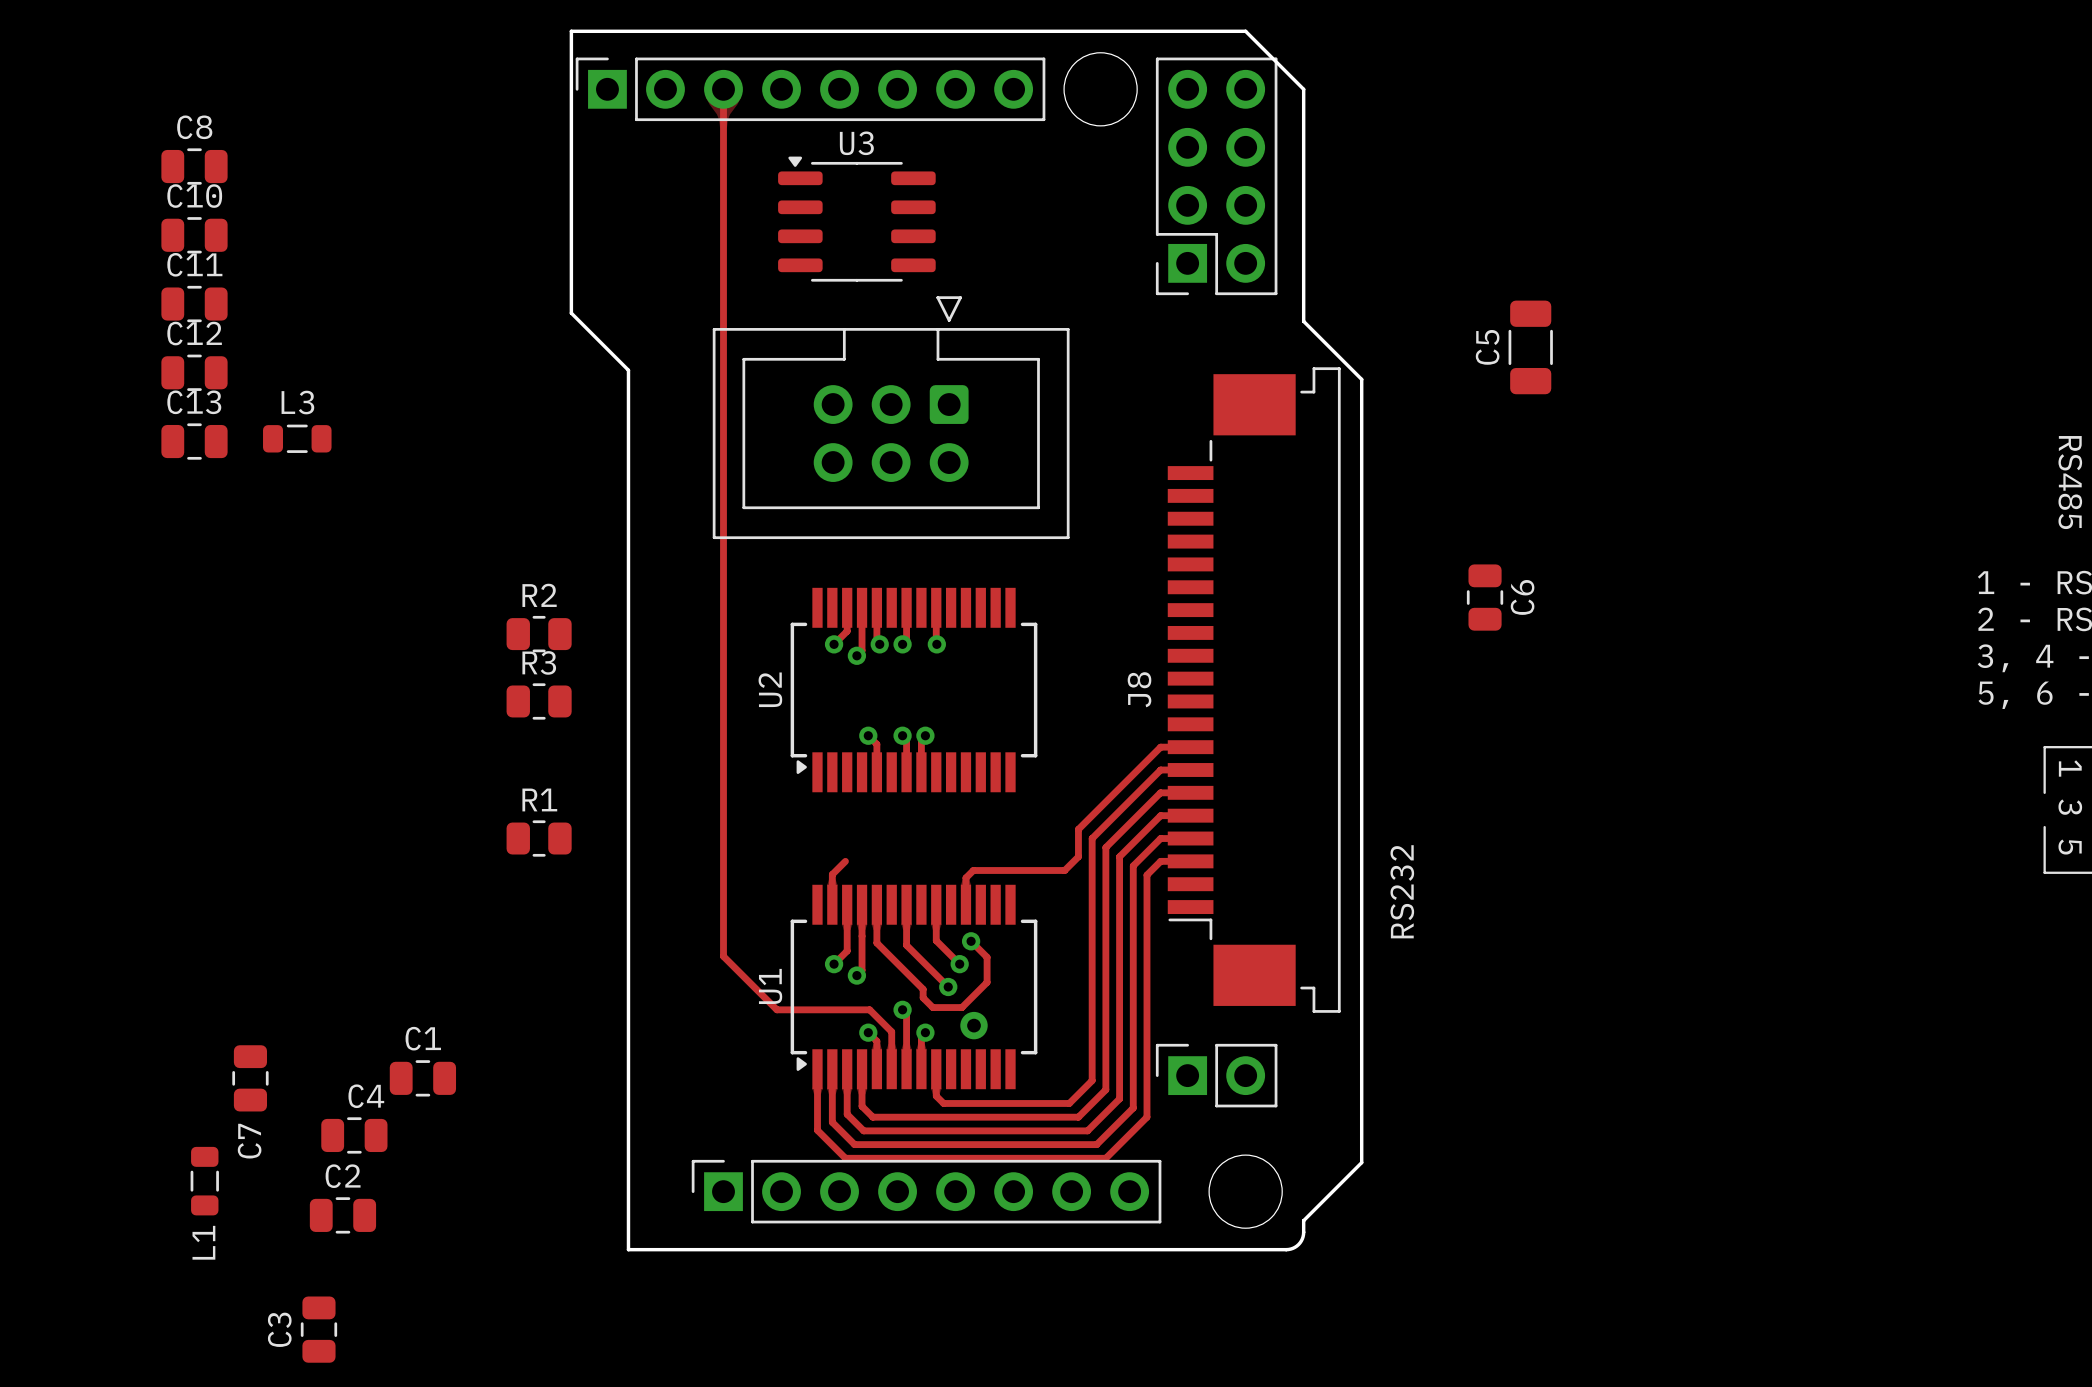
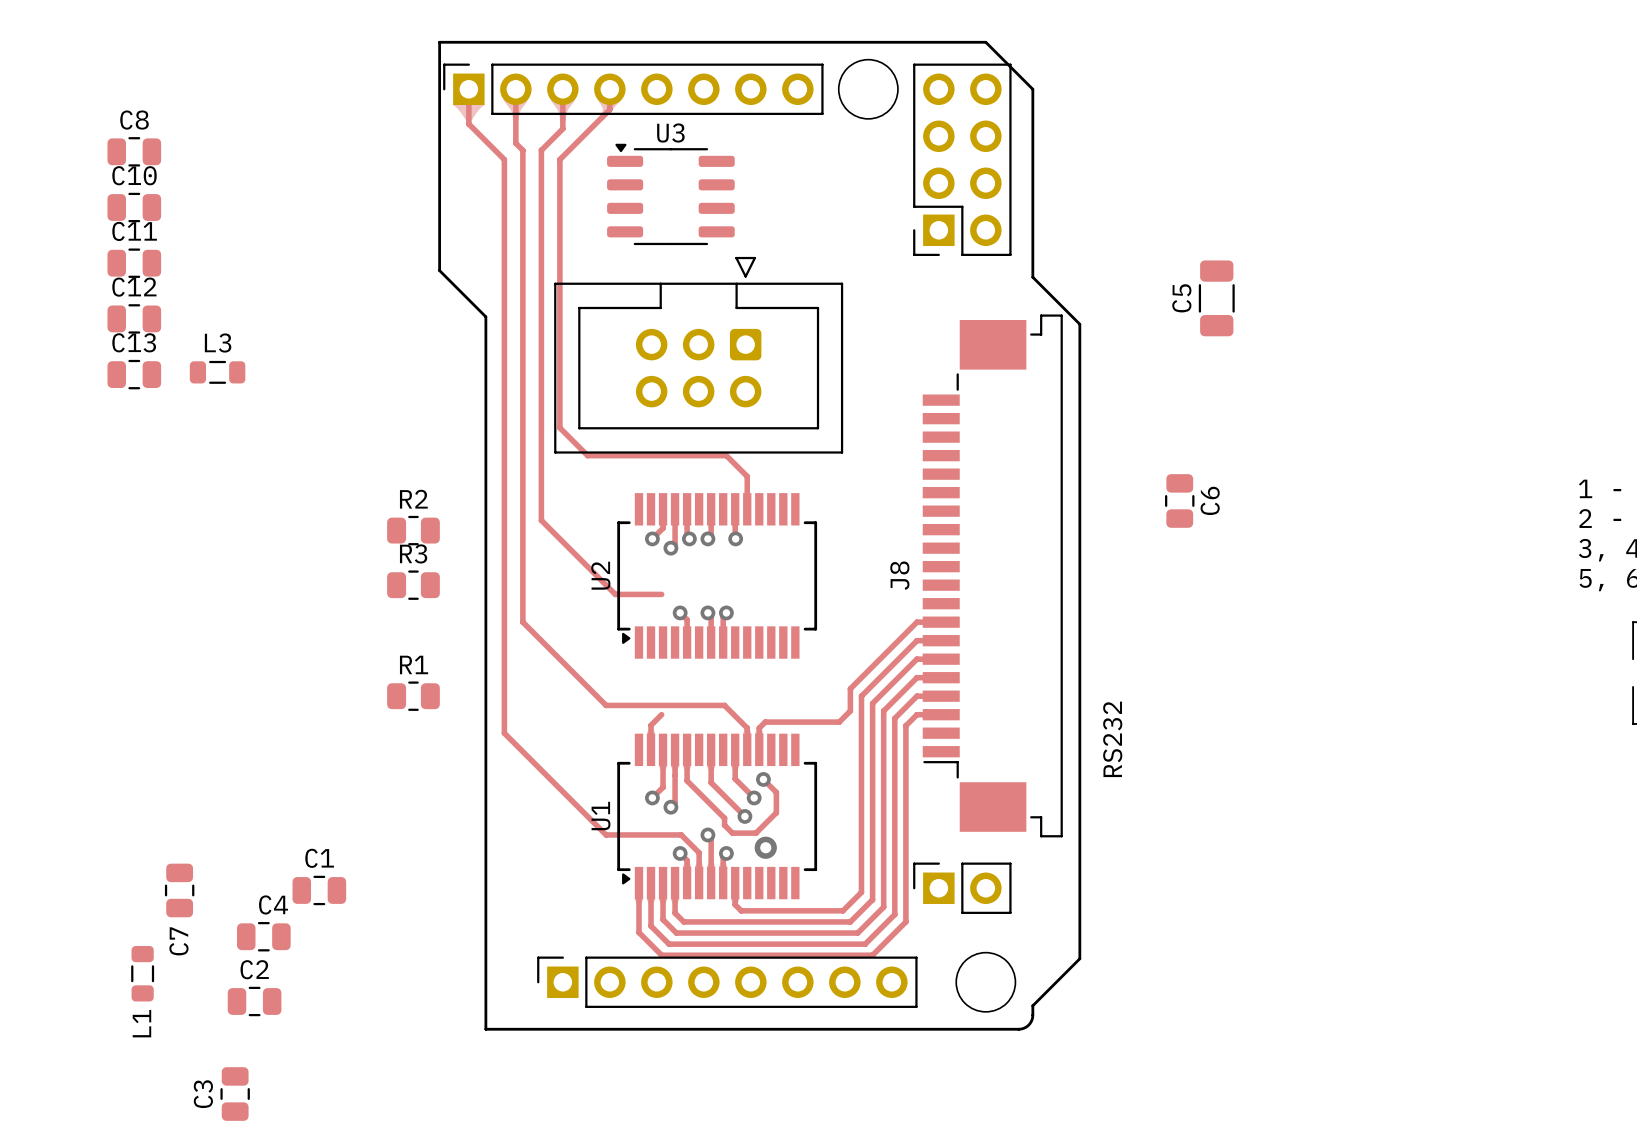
track: none -> (515, 89) (515, 143) (522, 150) (522, 622) (606, 705) (724, 705) (747, 728) (747, 749)
track: none -> (609, 89) (609, 109) (559, 159) (559, 427) (587, 455) (726, 455) (747, 476) (747, 509)
track: (723, 138) (723, 956) -> (468, 89) (468, 124) (504, 159) (504, 733) (562, 791)
track: none -> (562, 128) (541, 150) (541, 520) (615, 594) (661, 594)

